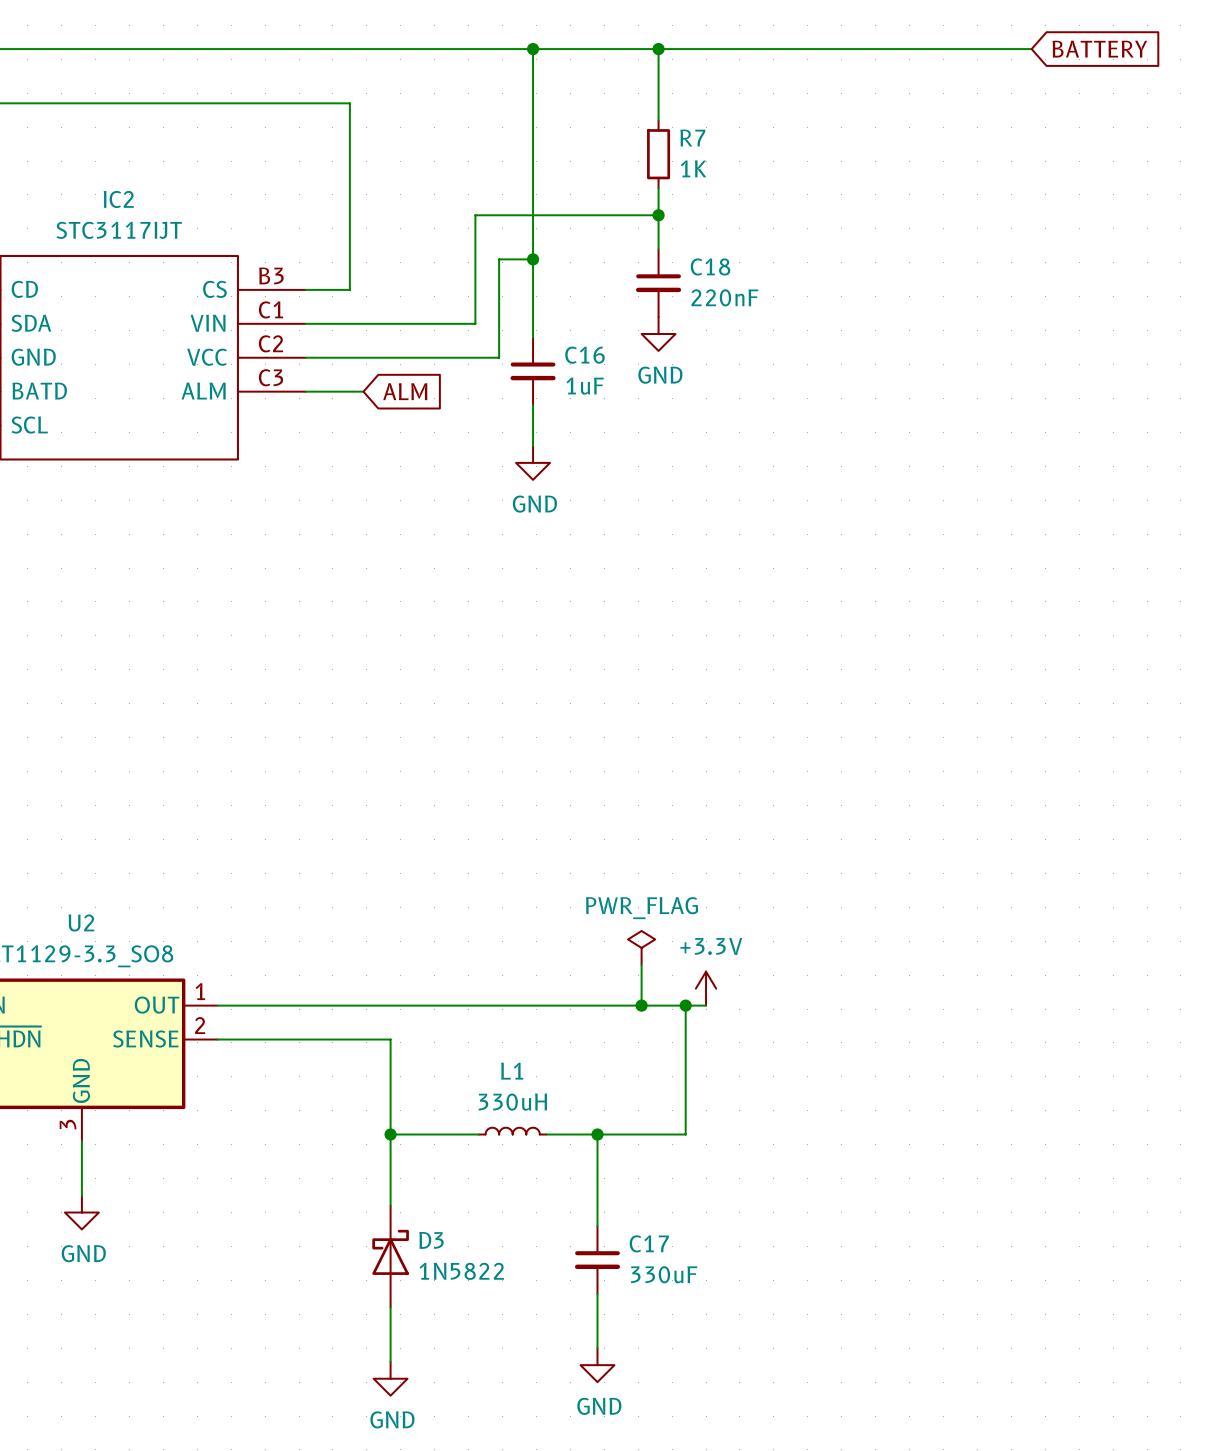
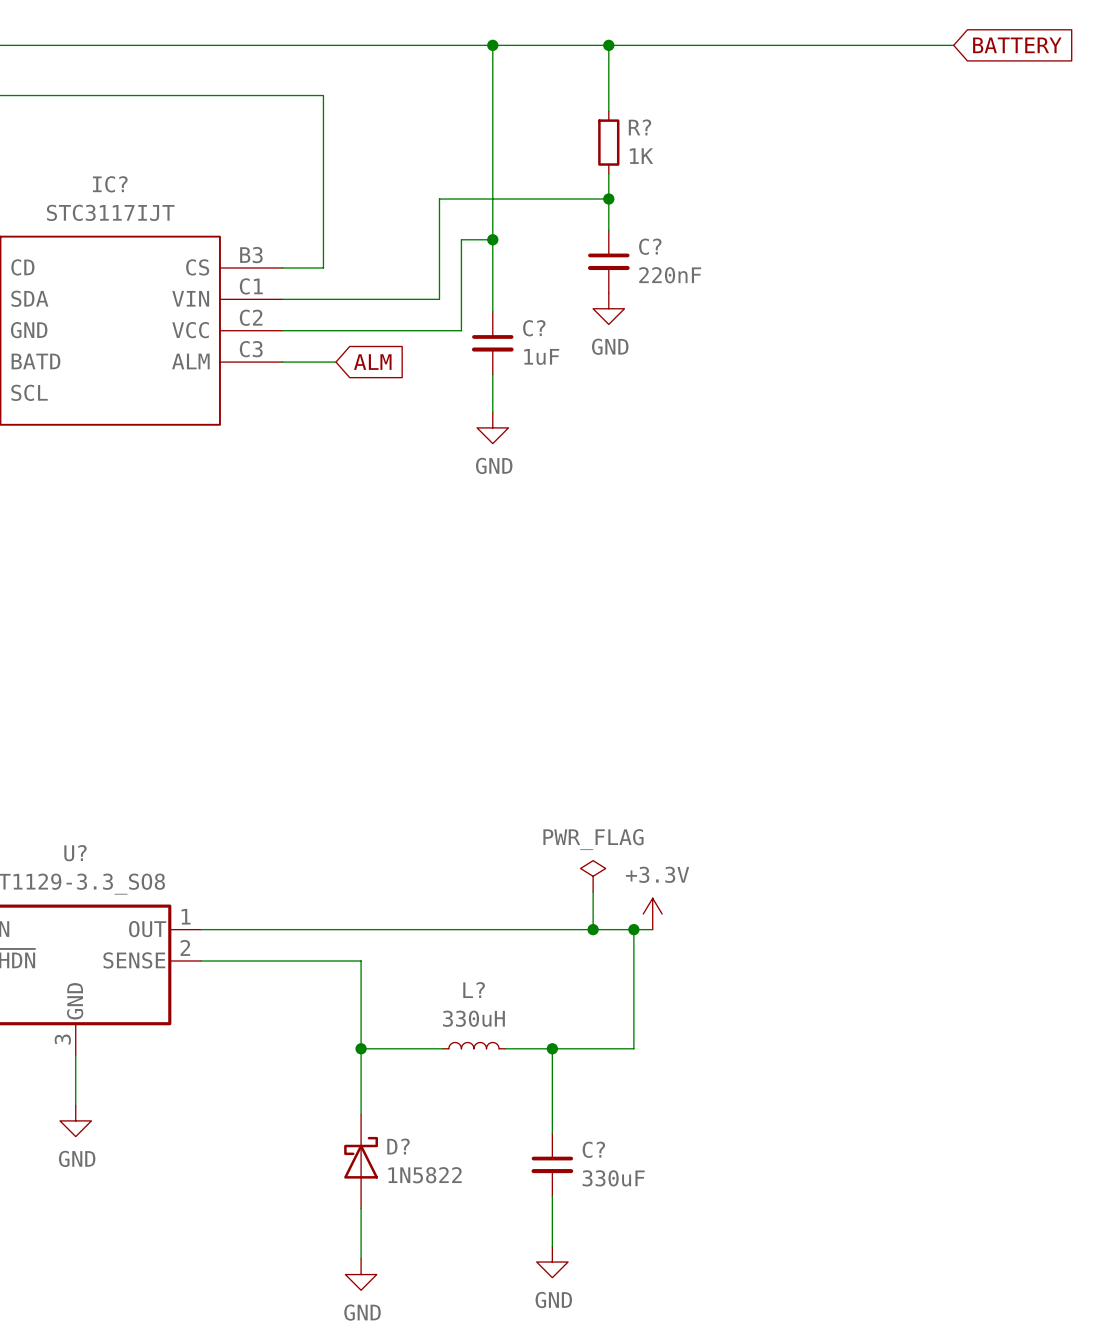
R7 name: R7 (692, 138) -> R? (639, 127)
IC2 name: IC2 (118, 199) -> IC? (110, 184)
C18 name: C18 (710, 266) -> C? (650, 246)
C16 name: C16 (584, 355) -> C? (534, 328)
U2 name: U2 (81, 922) -> U? (75, 853)
L1 name: L1 (512, 1071) -> L? (474, 990)
D3 name: D3 (431, 1240) -> D? (398, 1146)
C17 name: C17 (649, 1243) -> C? (593, 1149)

